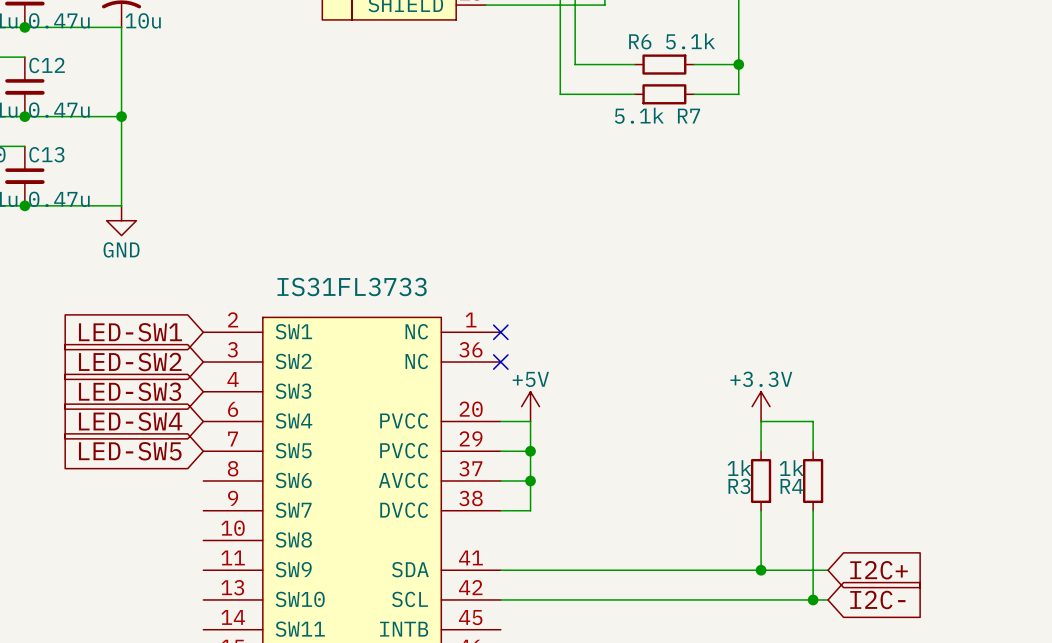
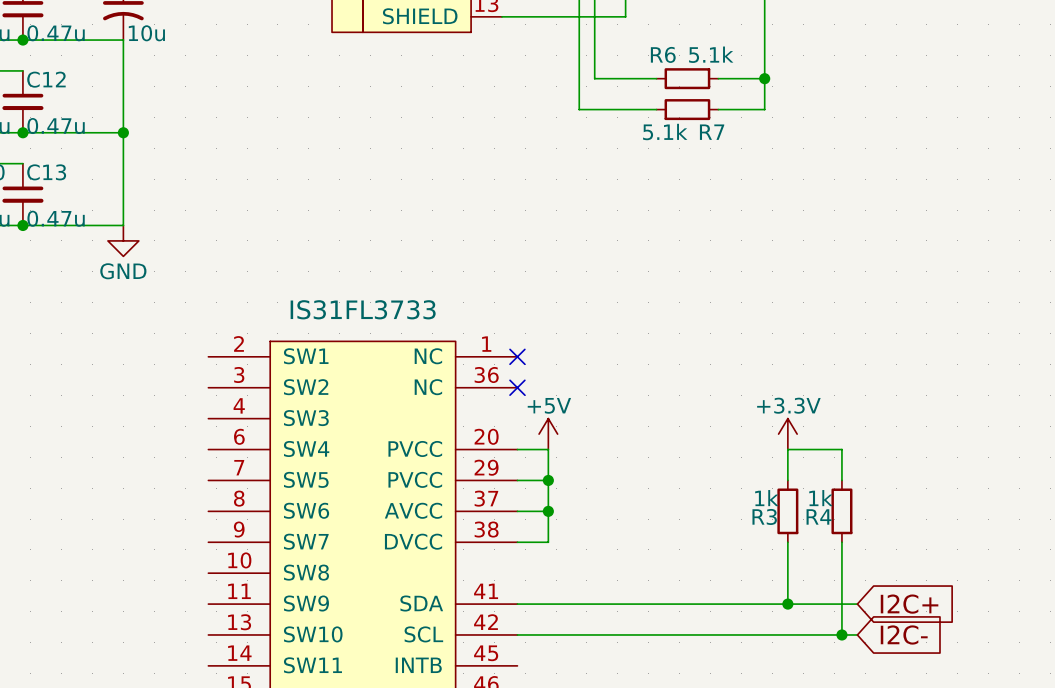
global label: LED-SW1 (130, 332) -> none
global label: LED-SW2 (130, 362) -> none
global label: LED-SW3 (130, 391) -> none
global label: LED-SW4 (130, 421) -> none
global label: LED-SW5 (130, 451) -> none

